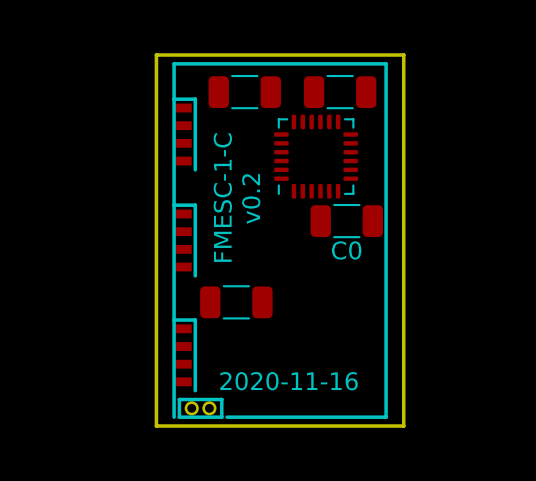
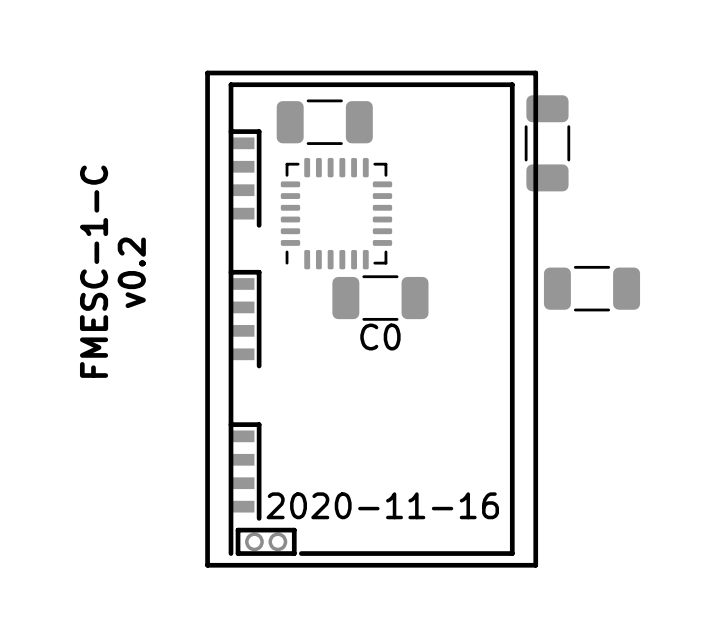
part rotation: 0° (340, 92) -> 90° clockwise (547, 143)
part position: (340, 92) -> (547, 143)
part position: (316, 156) -> (336, 213)
text position: FMESC-1-C (222, 197) -> FMESC-1-C (94, 271)
text position: v0.2 (251, 198) -> v0.2 (131, 272)
part: none -> (591, 288)
C0 position: (346, 221) -> (380, 298)
part: (236, 302) -> none

